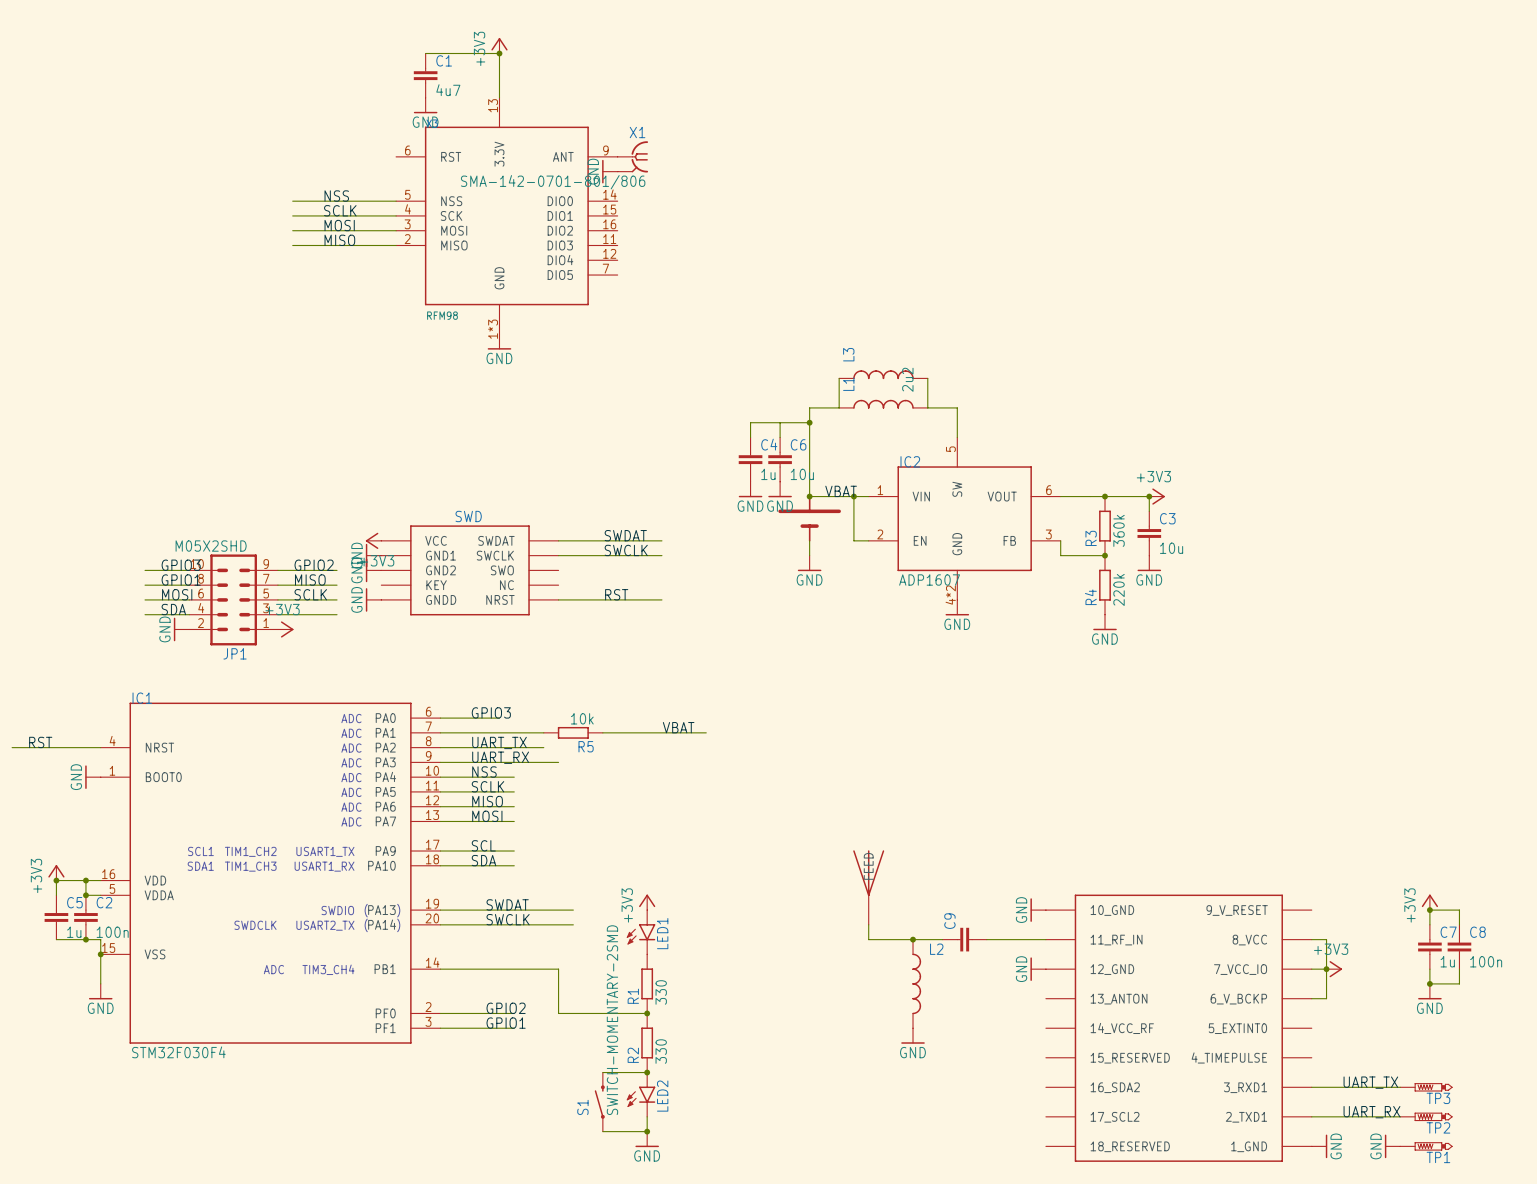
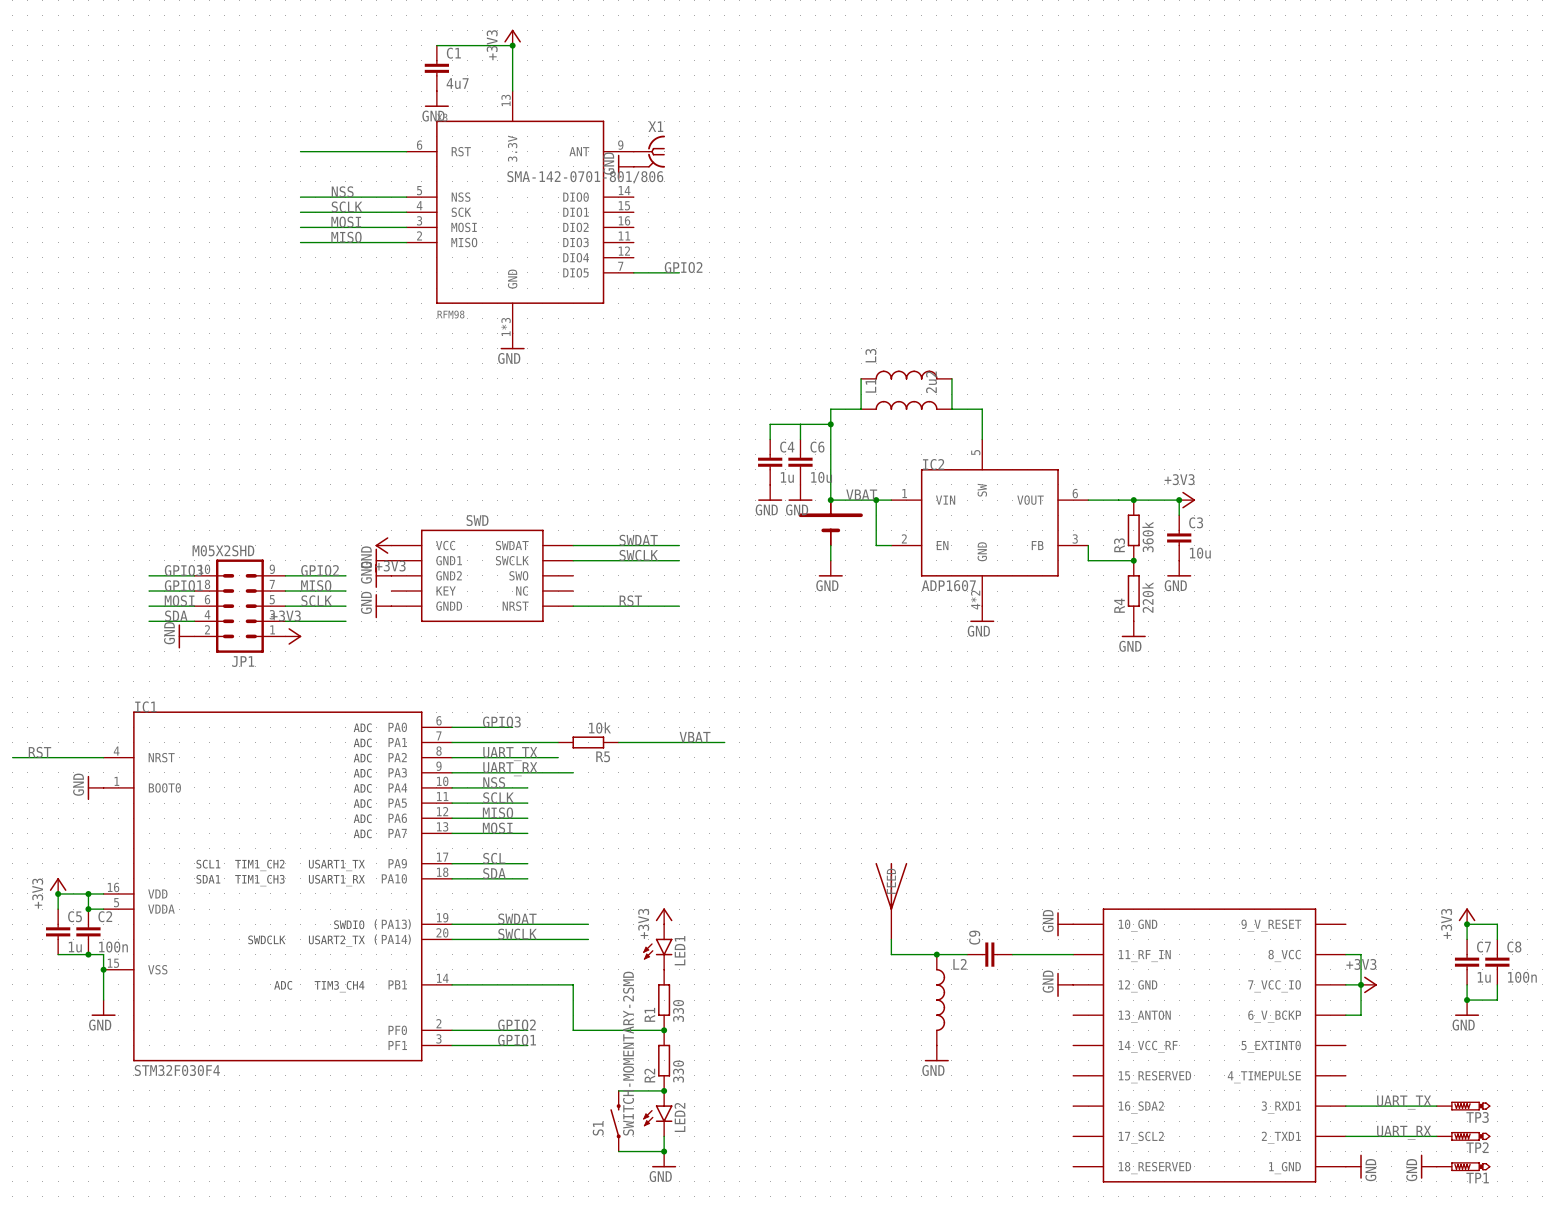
wire: none -> (300, 151) (406, 151)
label: none -> GPIO2 (683, 267)
wire: none -> (633, 272) (679, 272)

